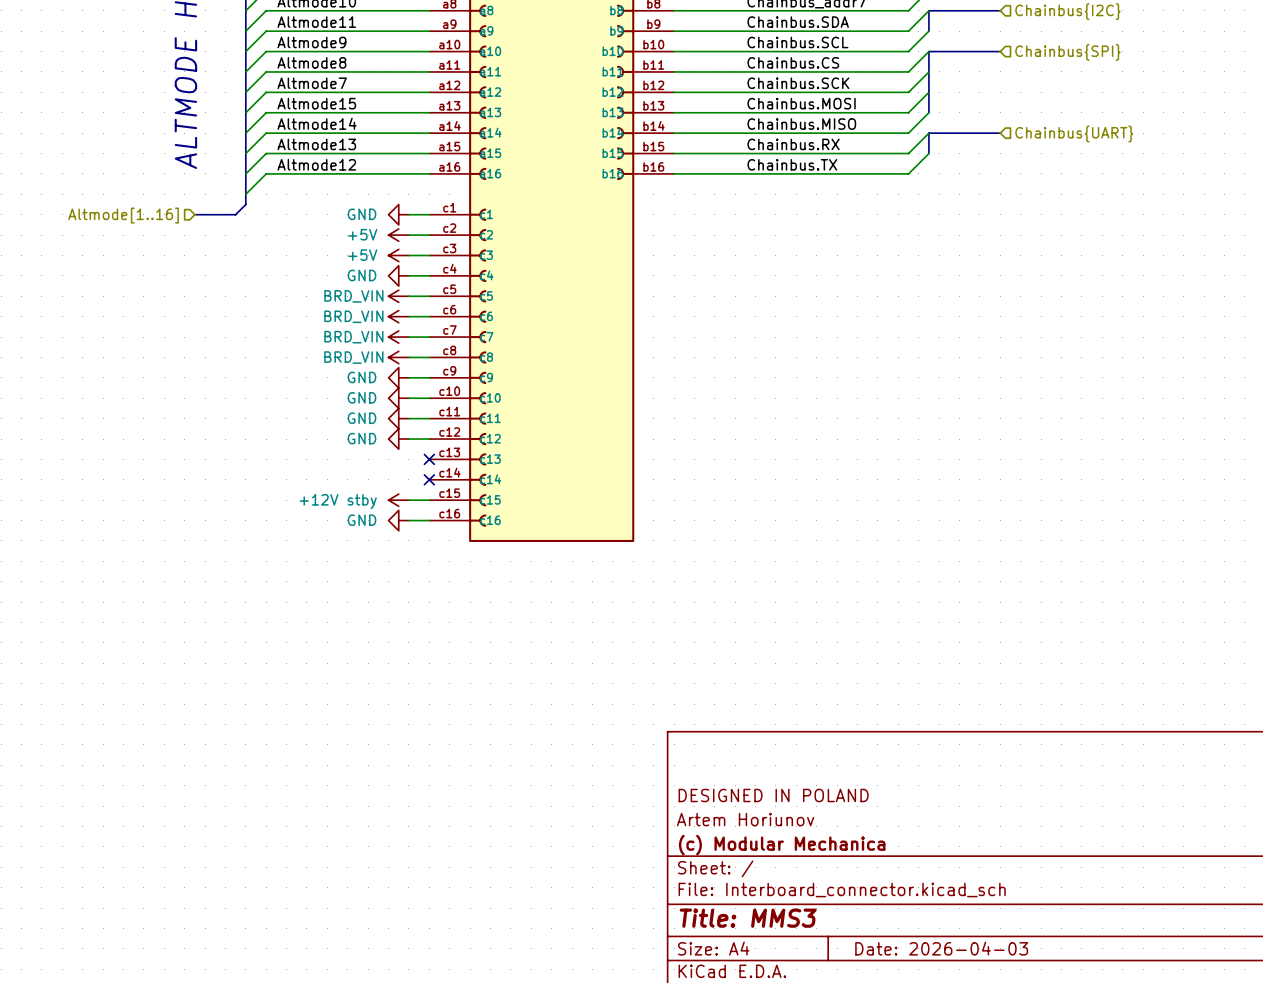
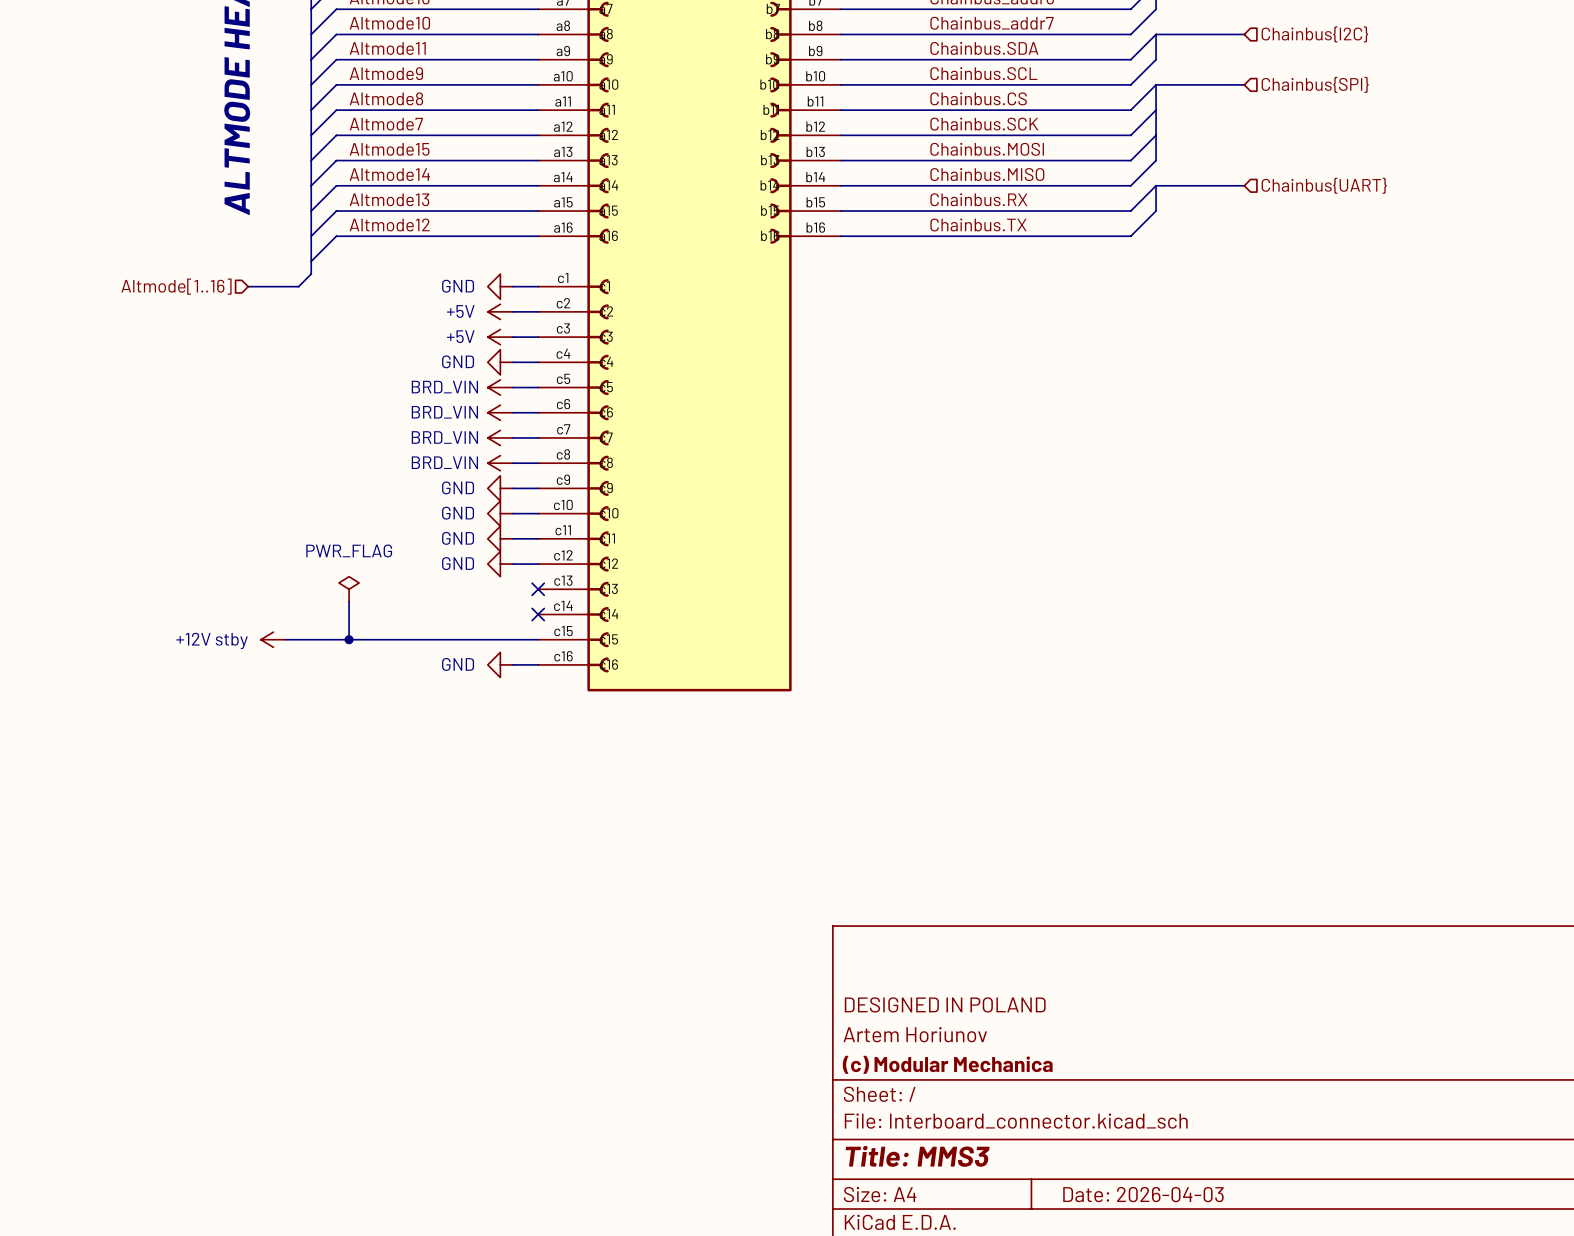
power symbol: none -> PWR_FLAG (349, 589)
wire: none -> (349, 601) (349, 639)
wire: none -> (286, 639) (512, 639)
junction: none -> (349, 639)
power symbol position: +12V stby (398, 500) -> +12V stby (273, 639)

